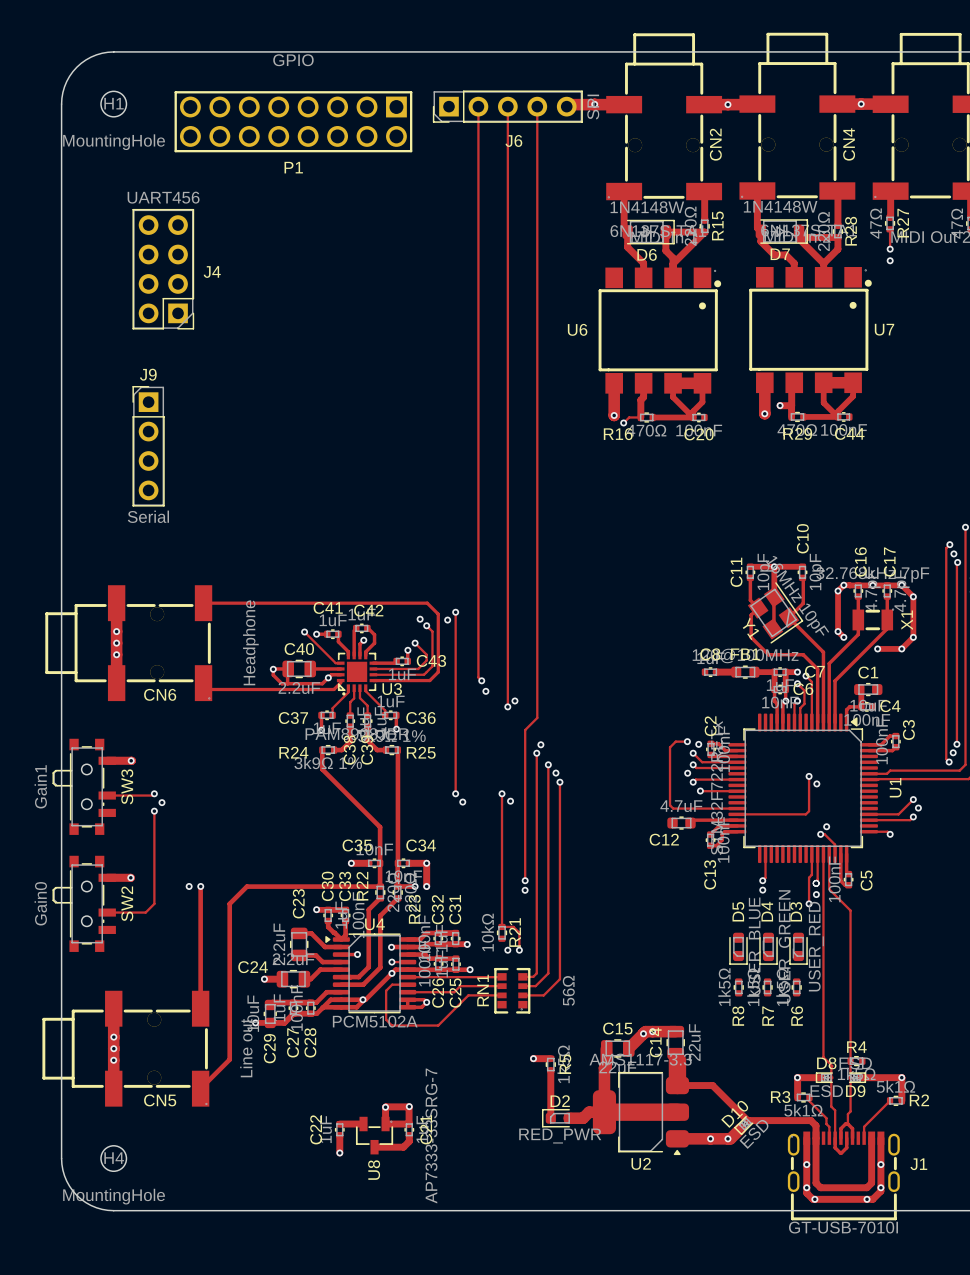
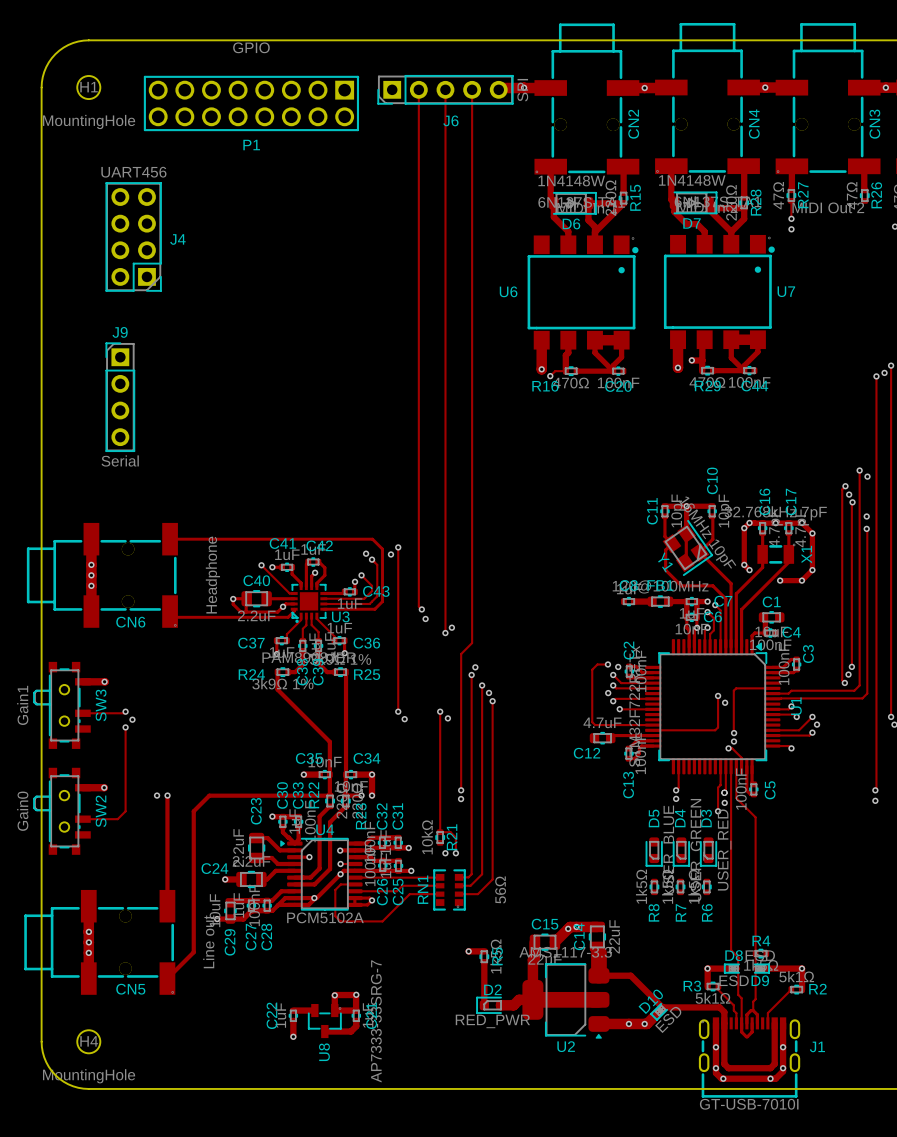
track: none -> (772, 688) (736, 688) (733, 690) (734, 733)
track: none -> (791, 706) (788, 709) (772, 709)
via: none -> (791, 706)
track: none -> (772, 714) (794, 714) (796, 716)
via: none -> (796, 716)
via: none -> (734, 733)

